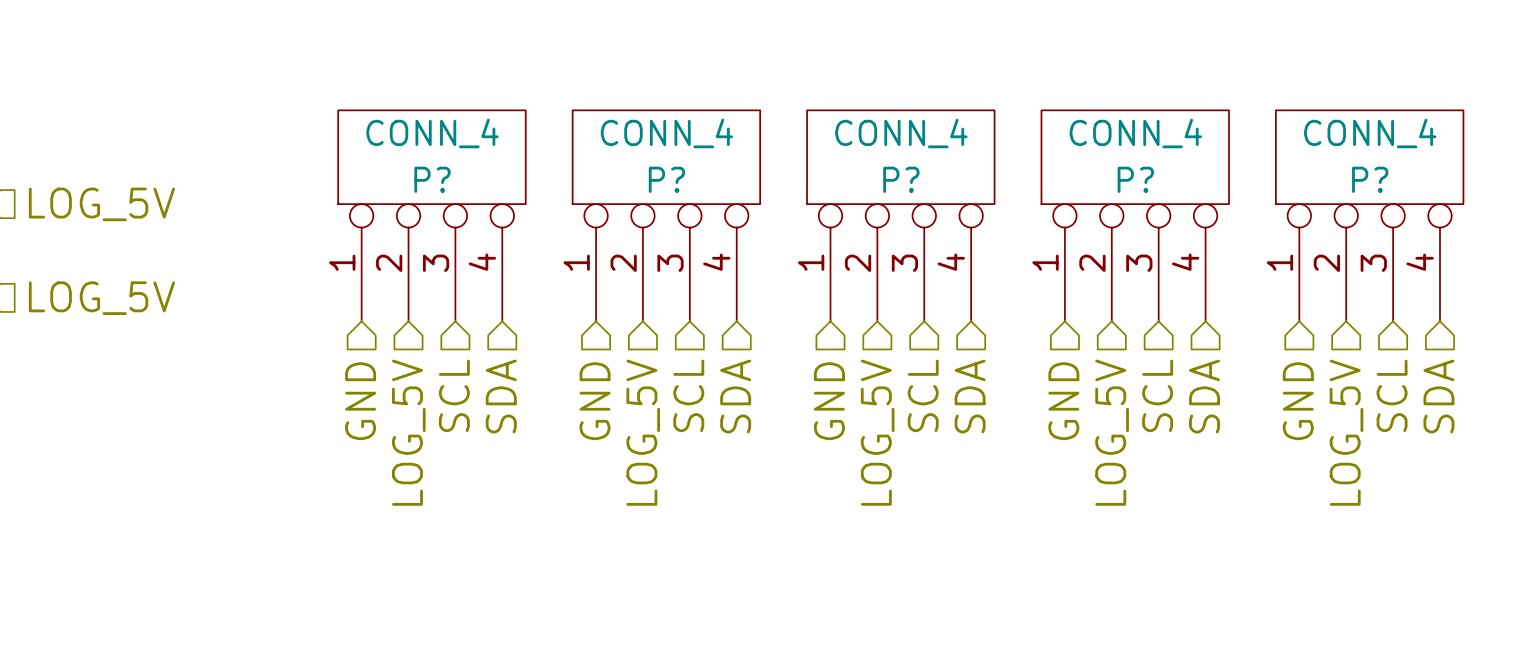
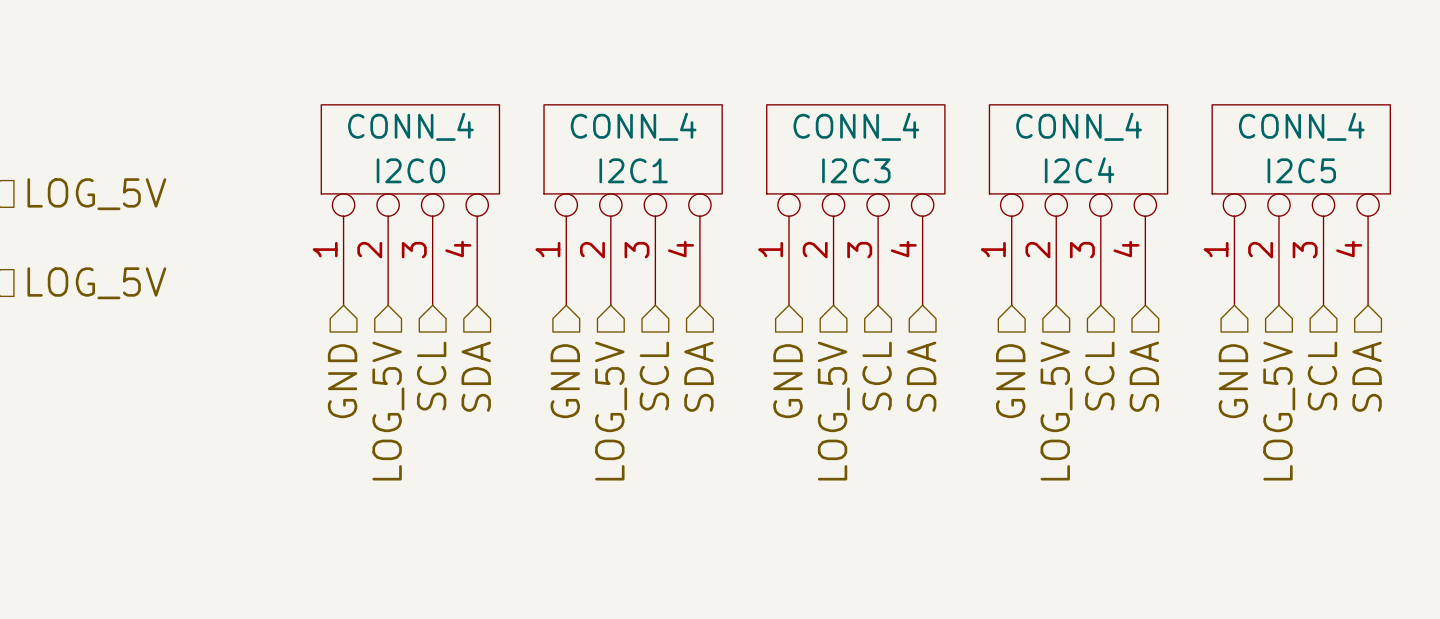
P? name: P? (432, 179) -> I2C0 (410, 170)
P? name: P? (666, 179) -> I2C1 (633, 170)
P? name: P? (901, 179) -> I2C3 (856, 170)
P? name: P? (1135, 179) -> I2C4 (1079, 170)
P? name: P? (1370, 179) -> I2C5 (1301, 170)

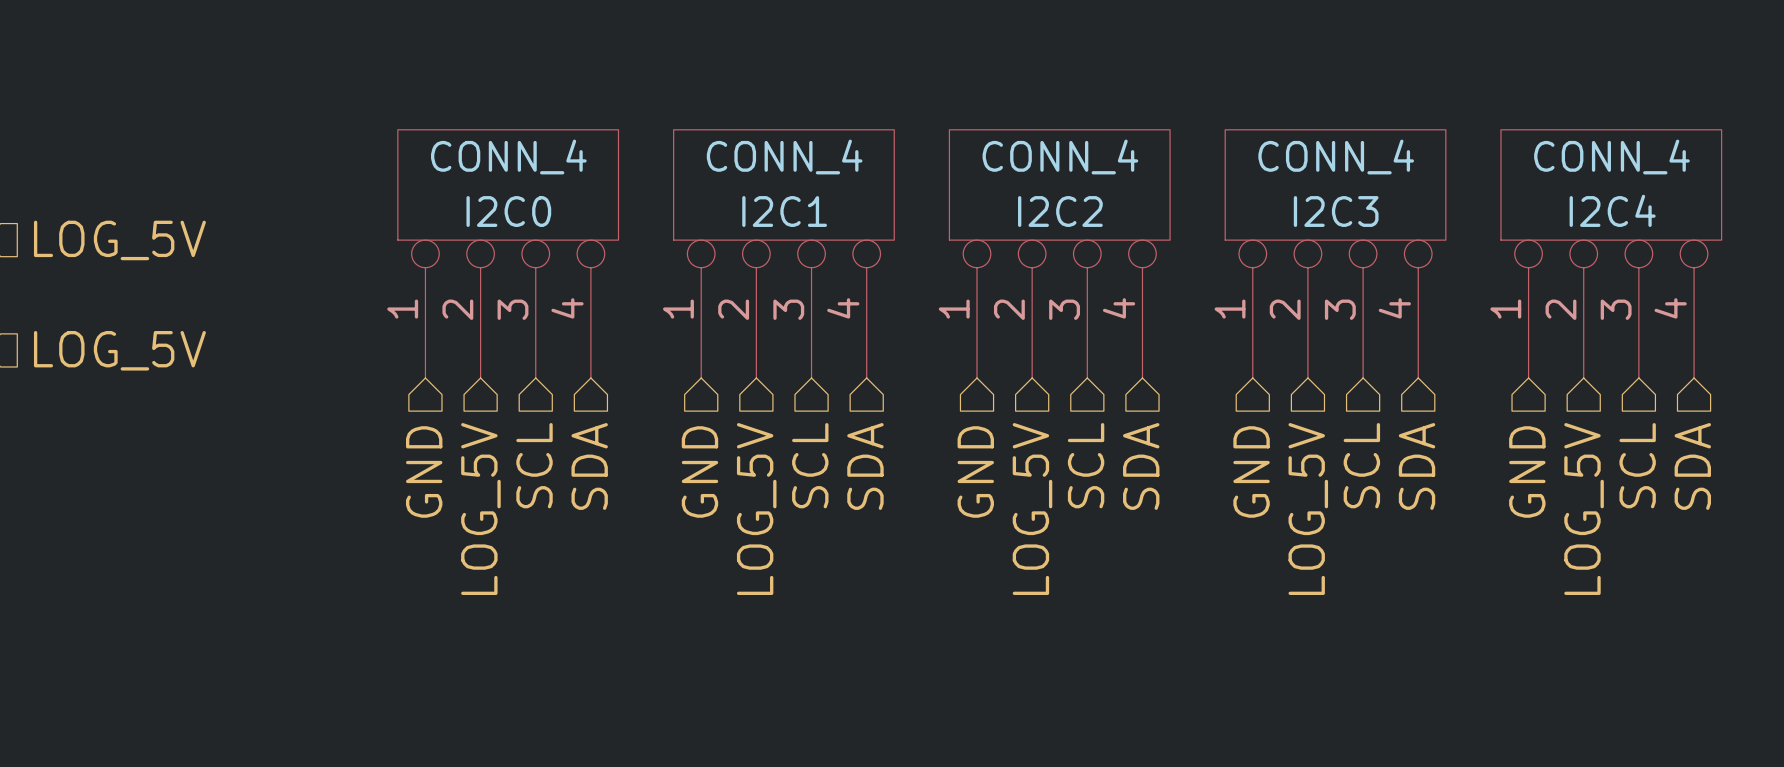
I2C3 name: I2C3 (856, 170) -> I2C2 (1060, 211)
I2C4 name: I2C4 (1079, 170) -> I2C3 (1336, 211)
I2C5 name: I2C5 (1301, 170) -> I2C4 (1612, 210)

